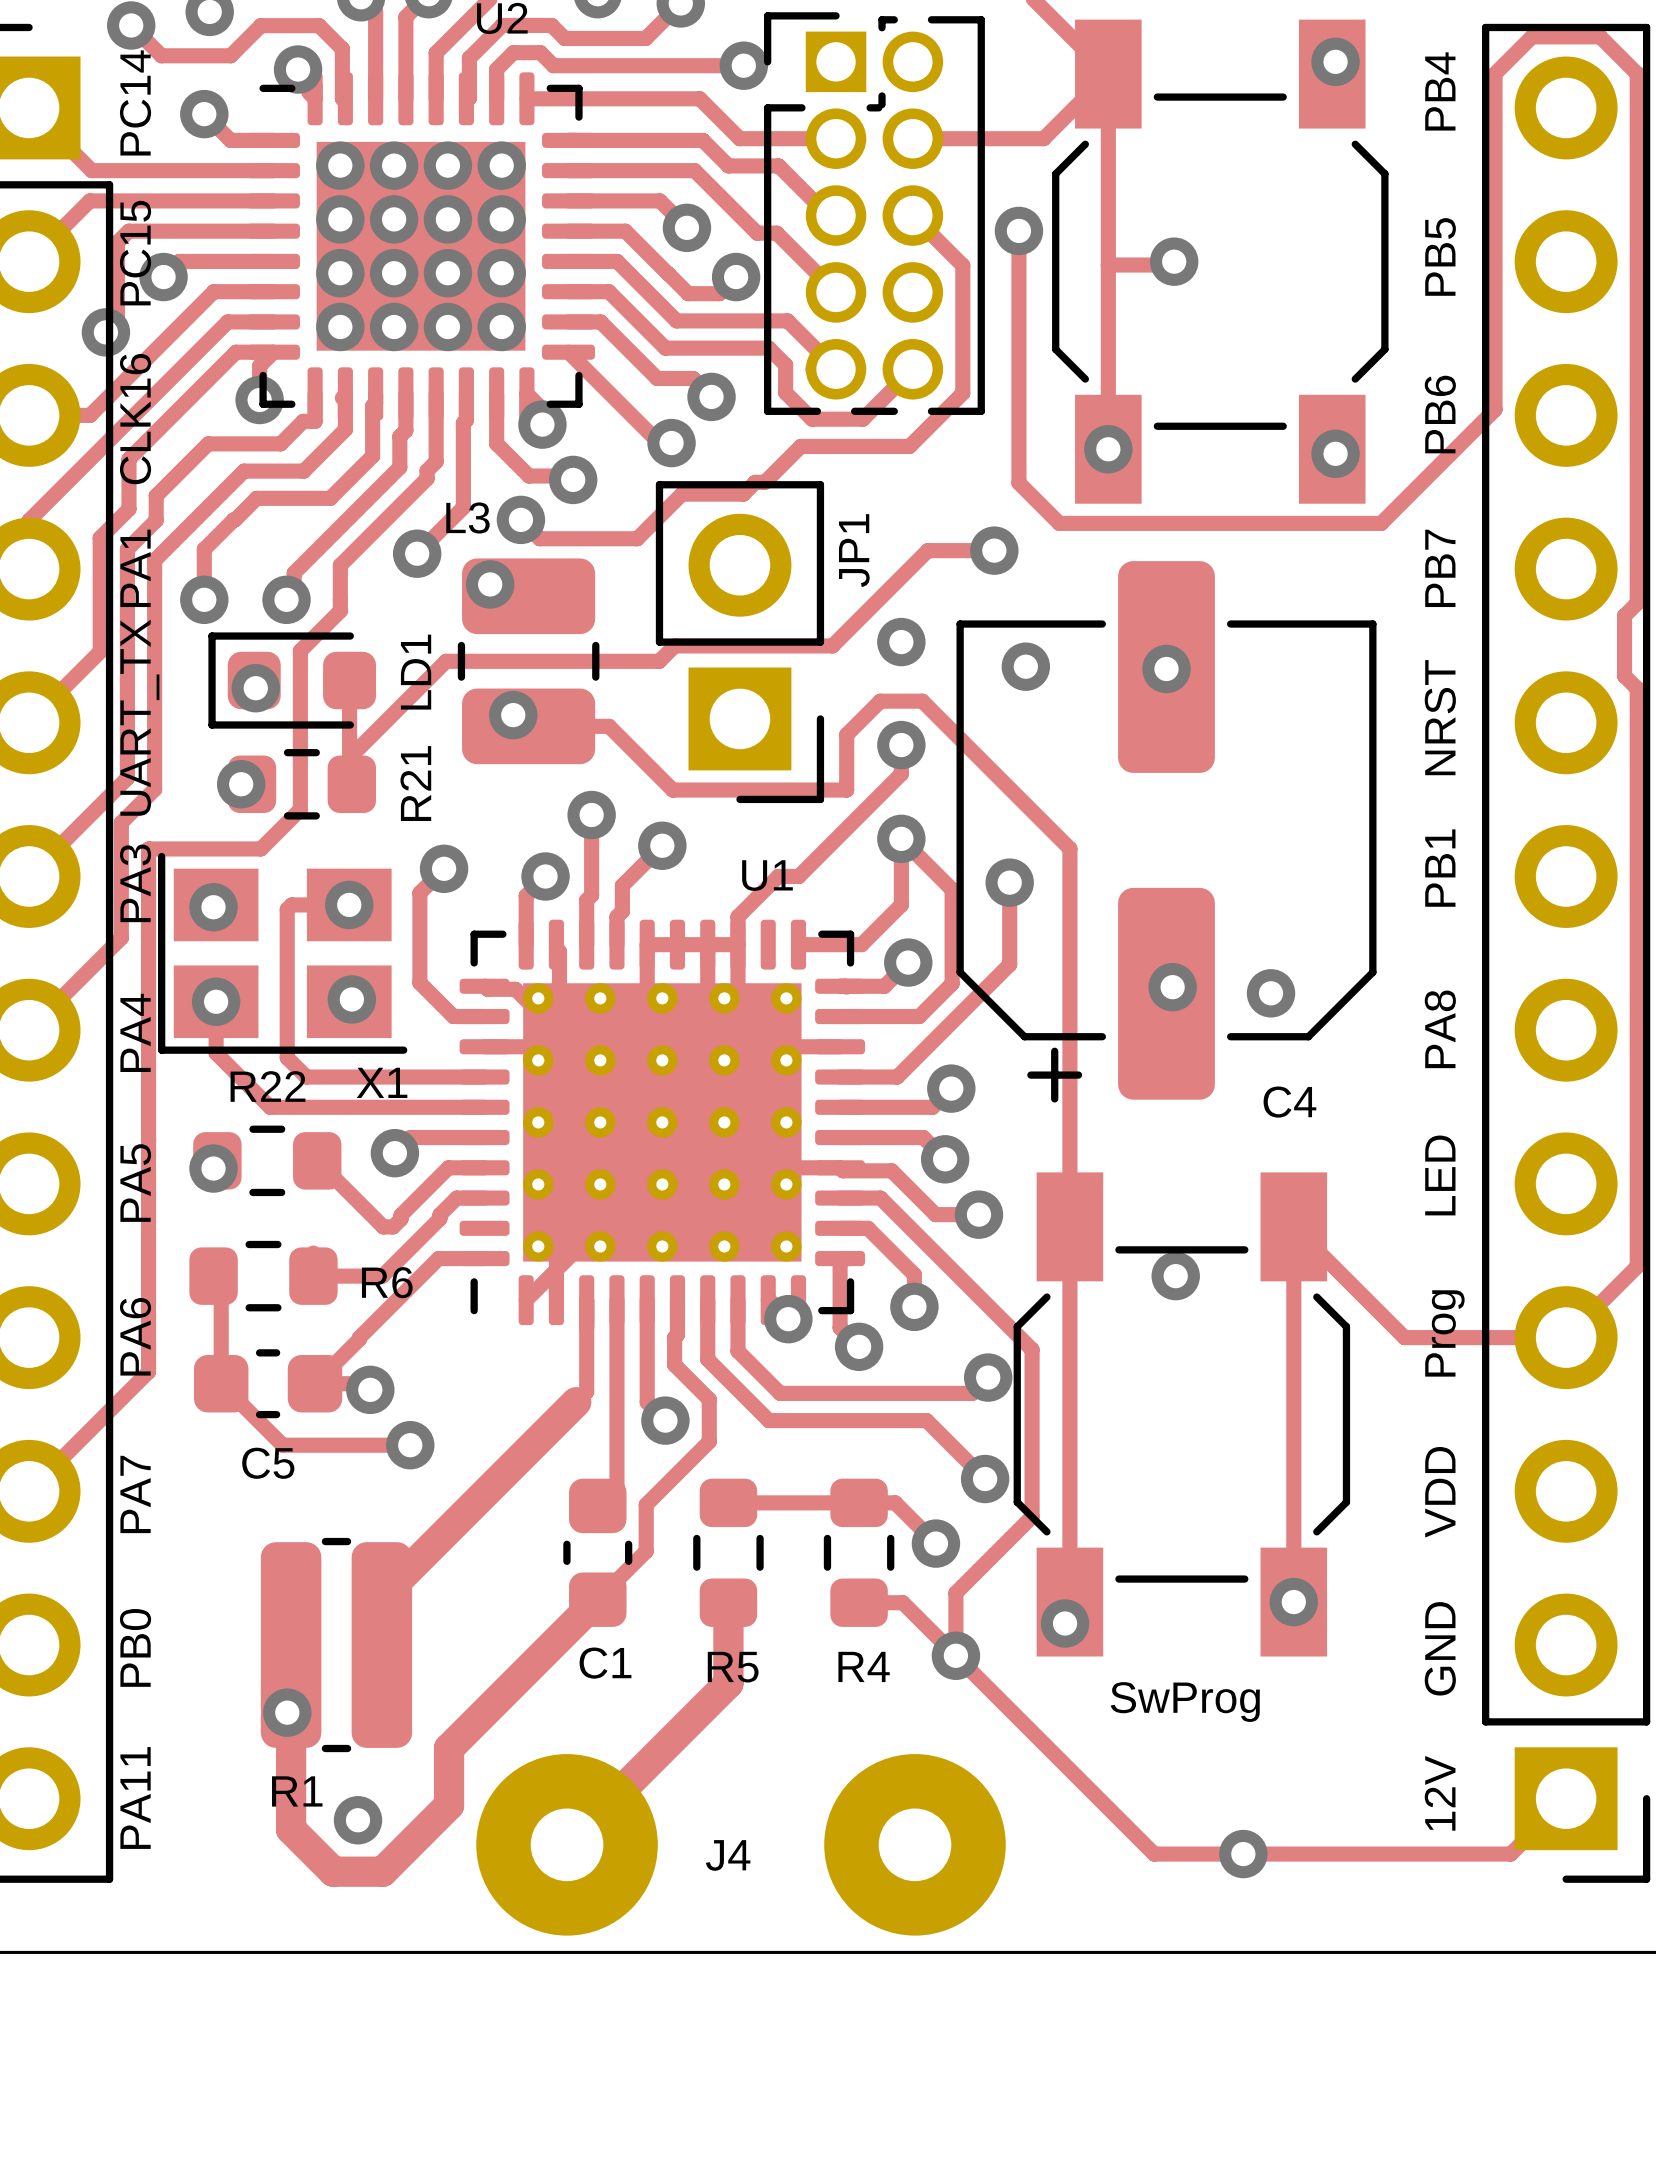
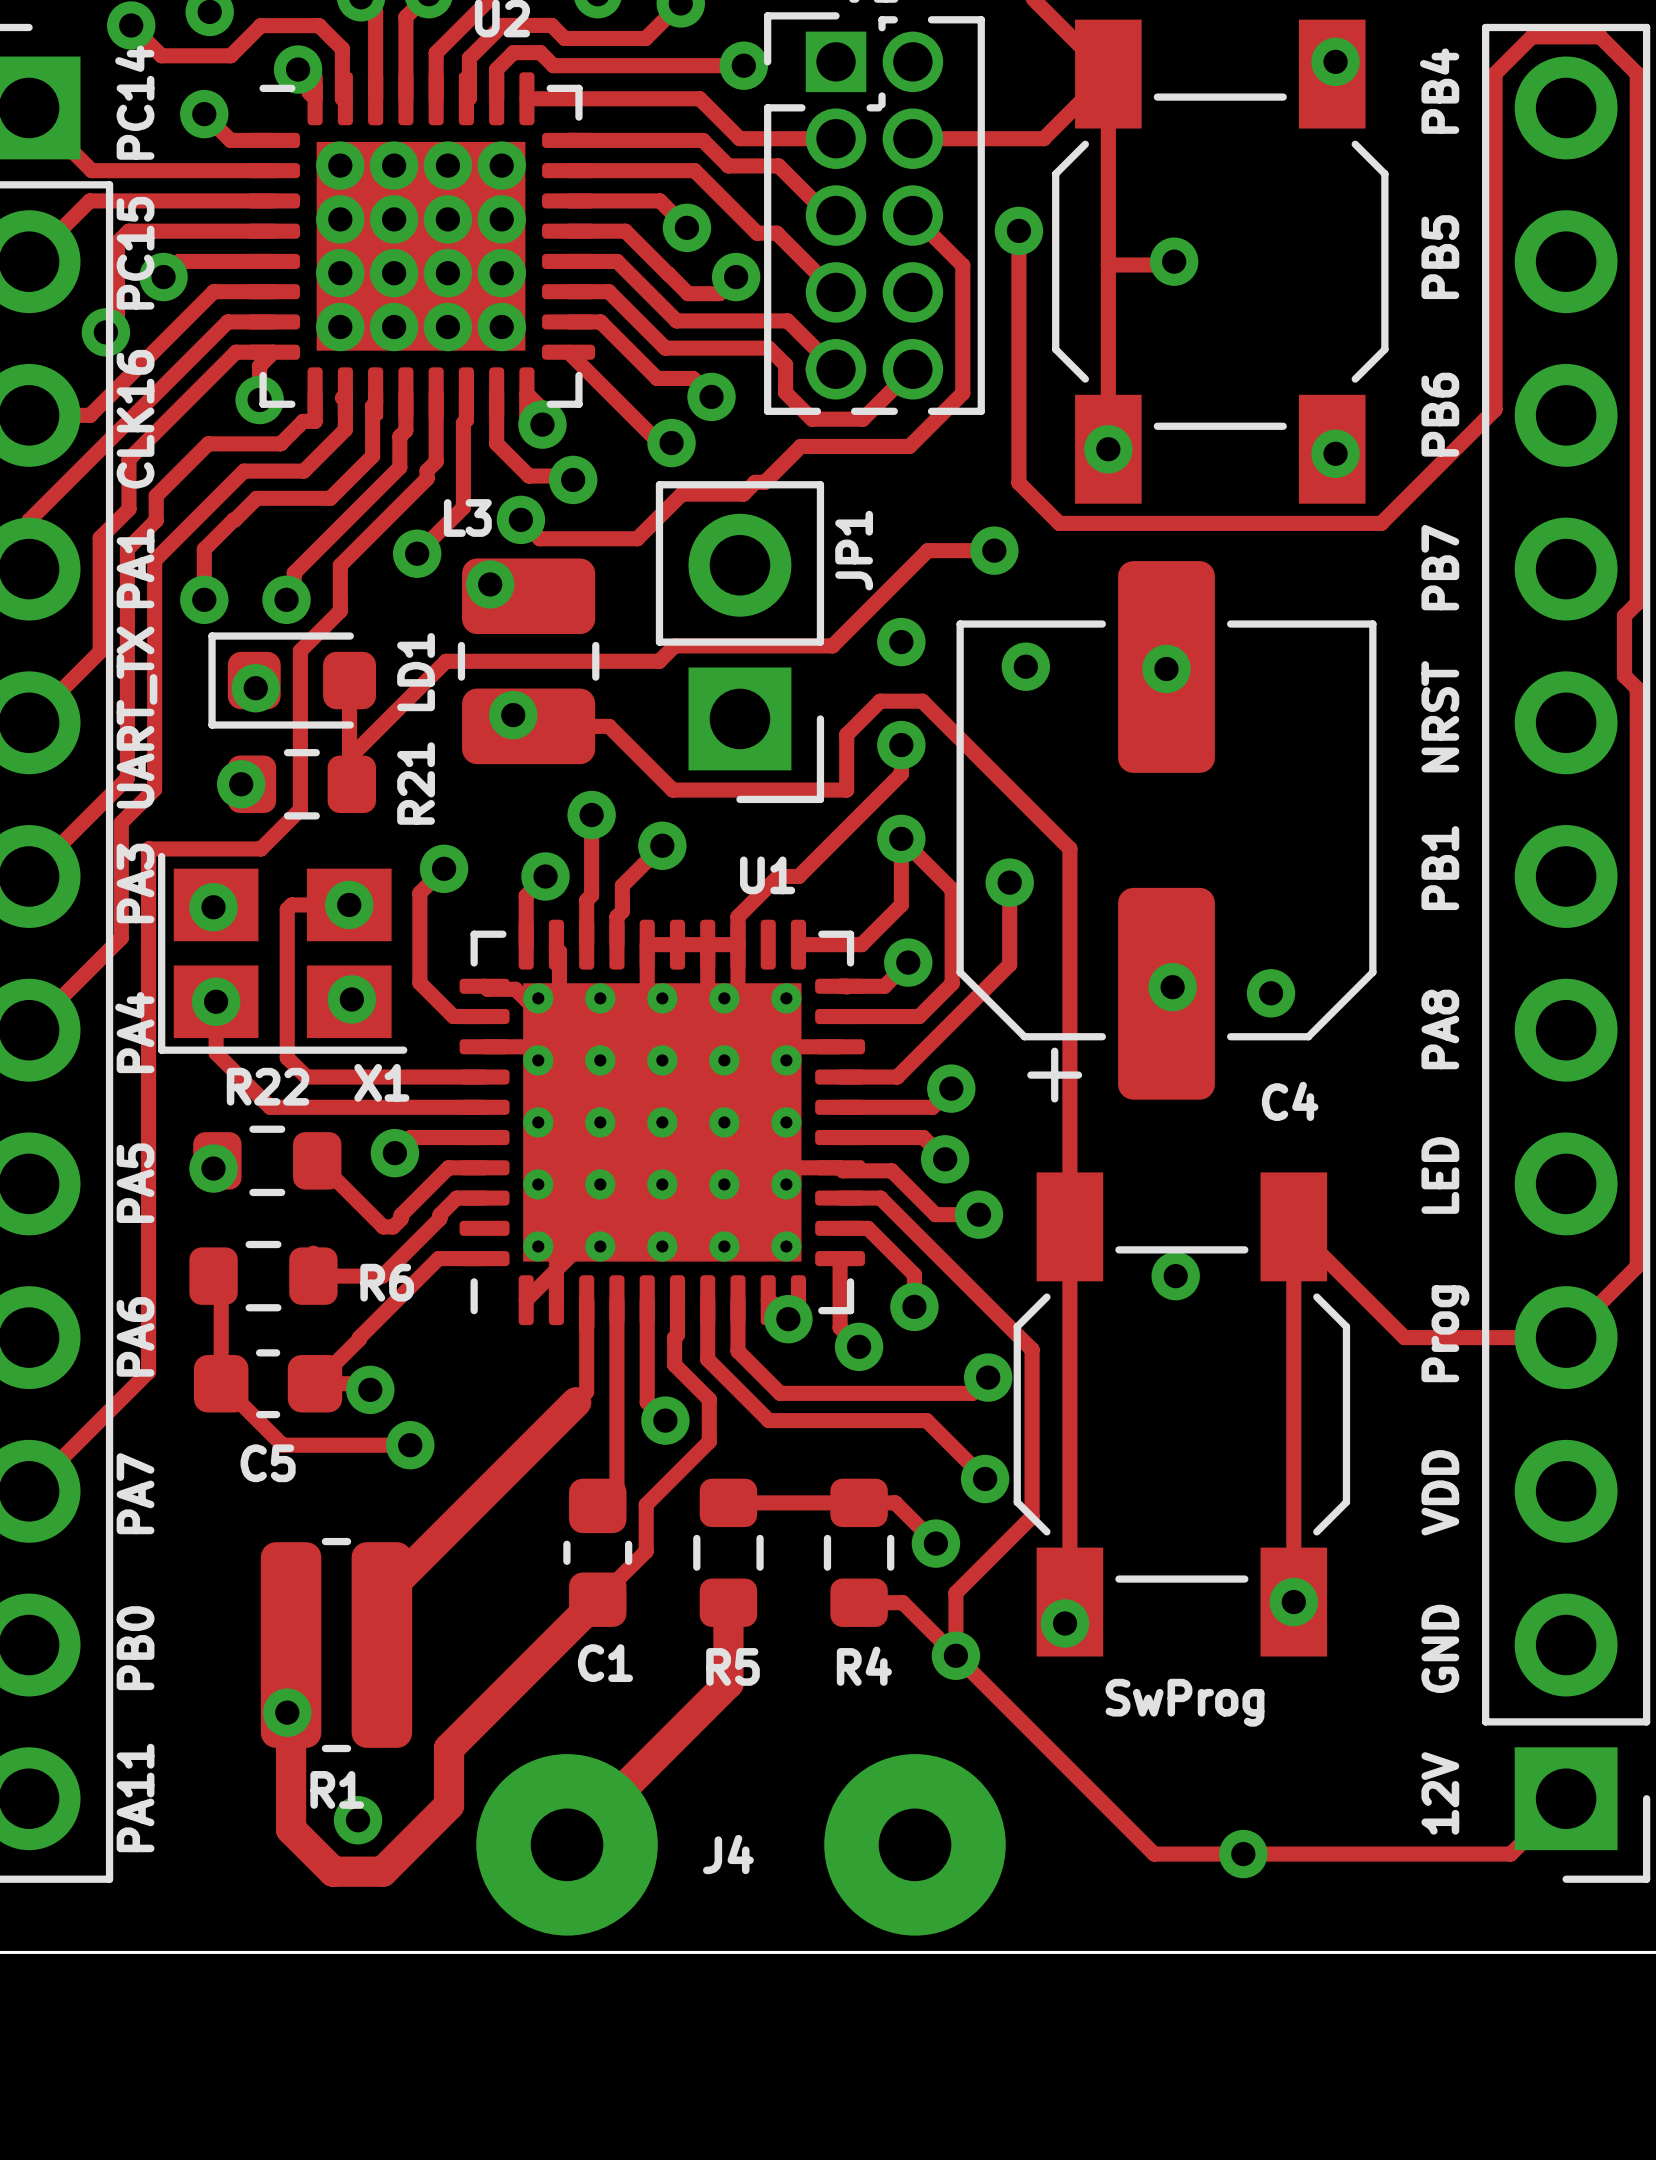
R1 name position: R1 (297, 1791) -> R1 (337, 1789)

